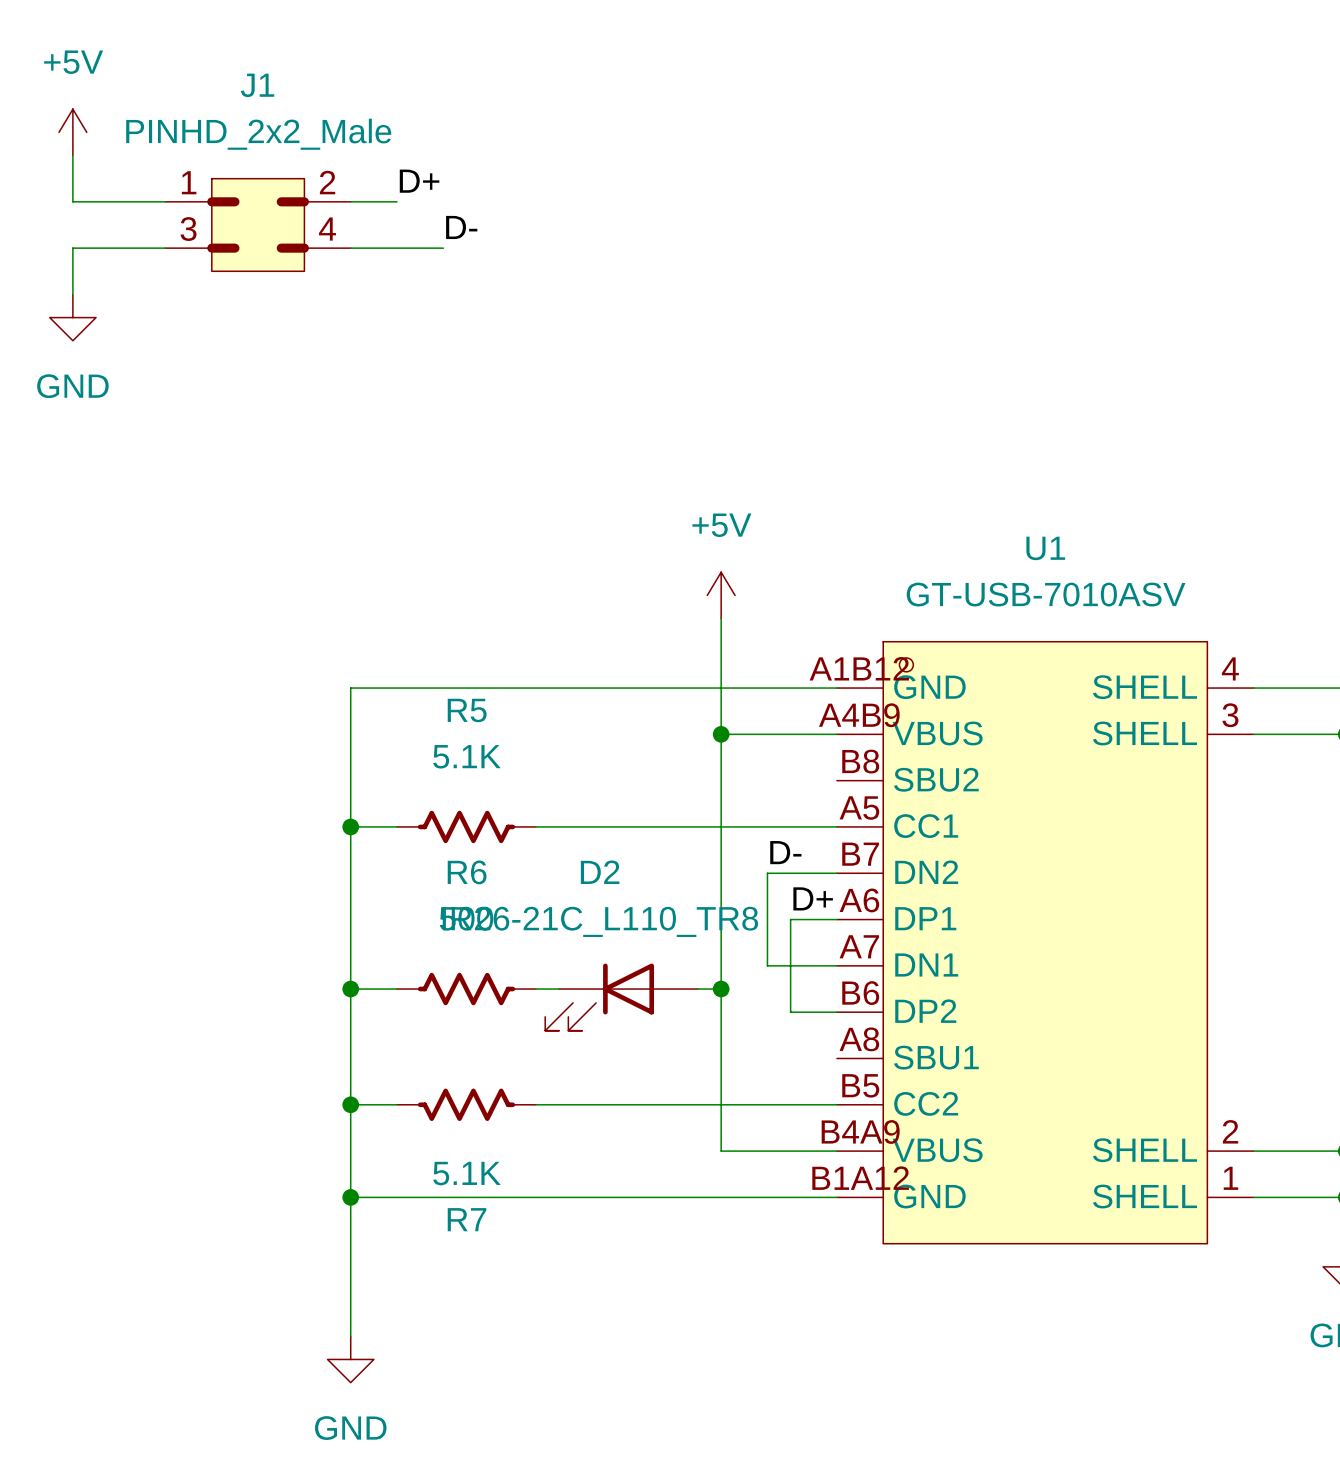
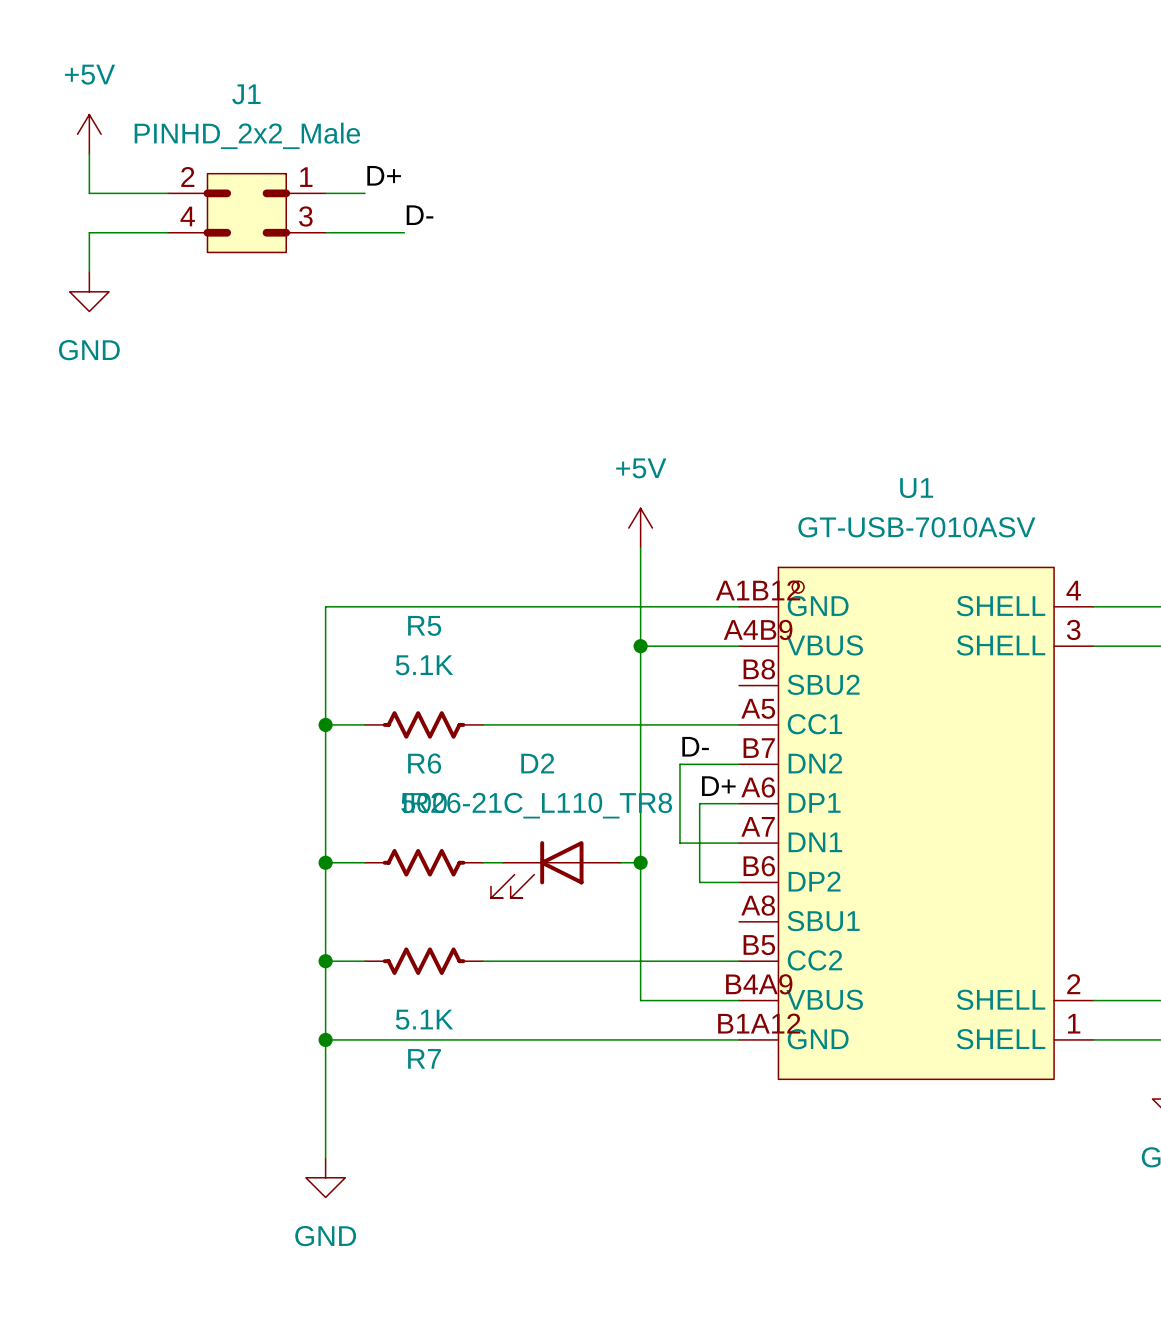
J1 flip: as is (258, 224) -> left-right (246, 213)

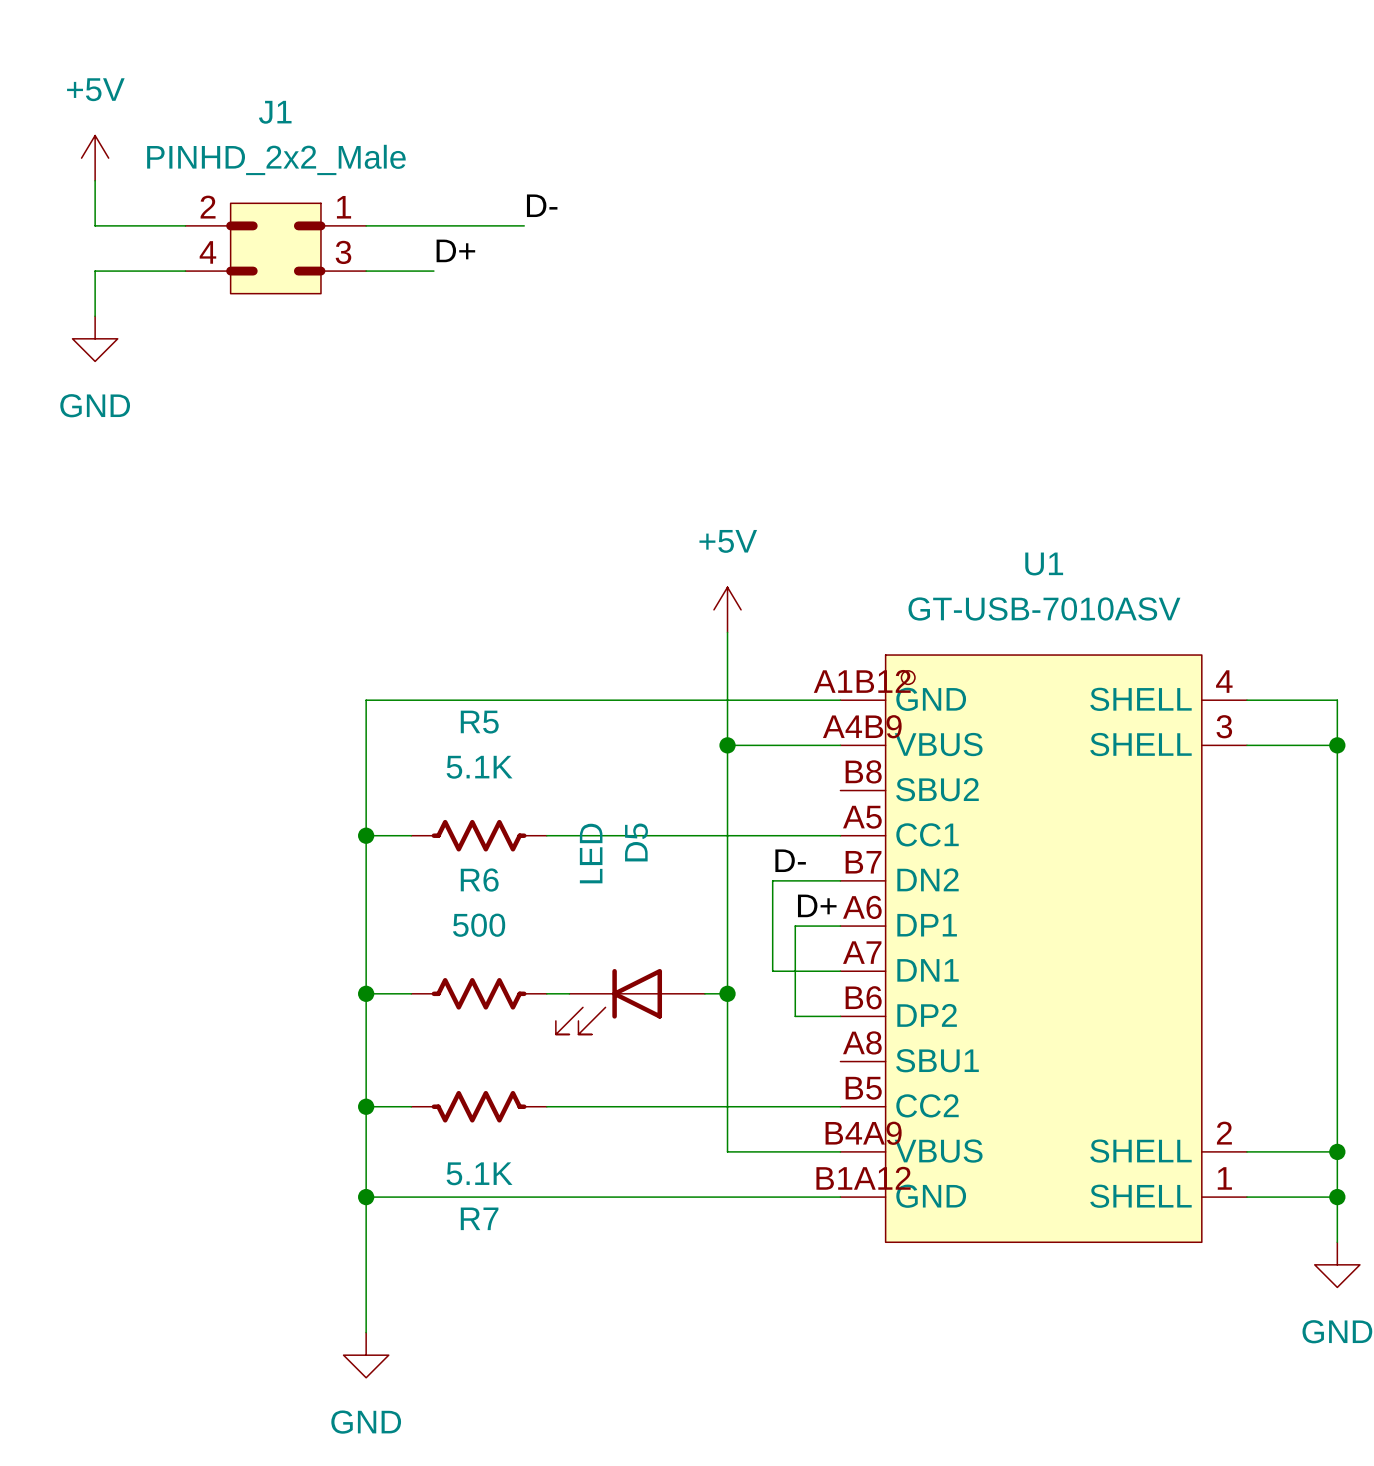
label position: D+ (384, 175) -> D+ (455, 250)
wire: none -> (411, 225) (524, 225)
label position: D- (420, 215) -> D- (542, 205)
wire: (384, 232) (404, 232) -> none
D2 name: D2 (537, 763) -> D5 (636, 842)
D2 value: IR26-21C_L110_TR8 (537, 805) -> LED (591, 853)

